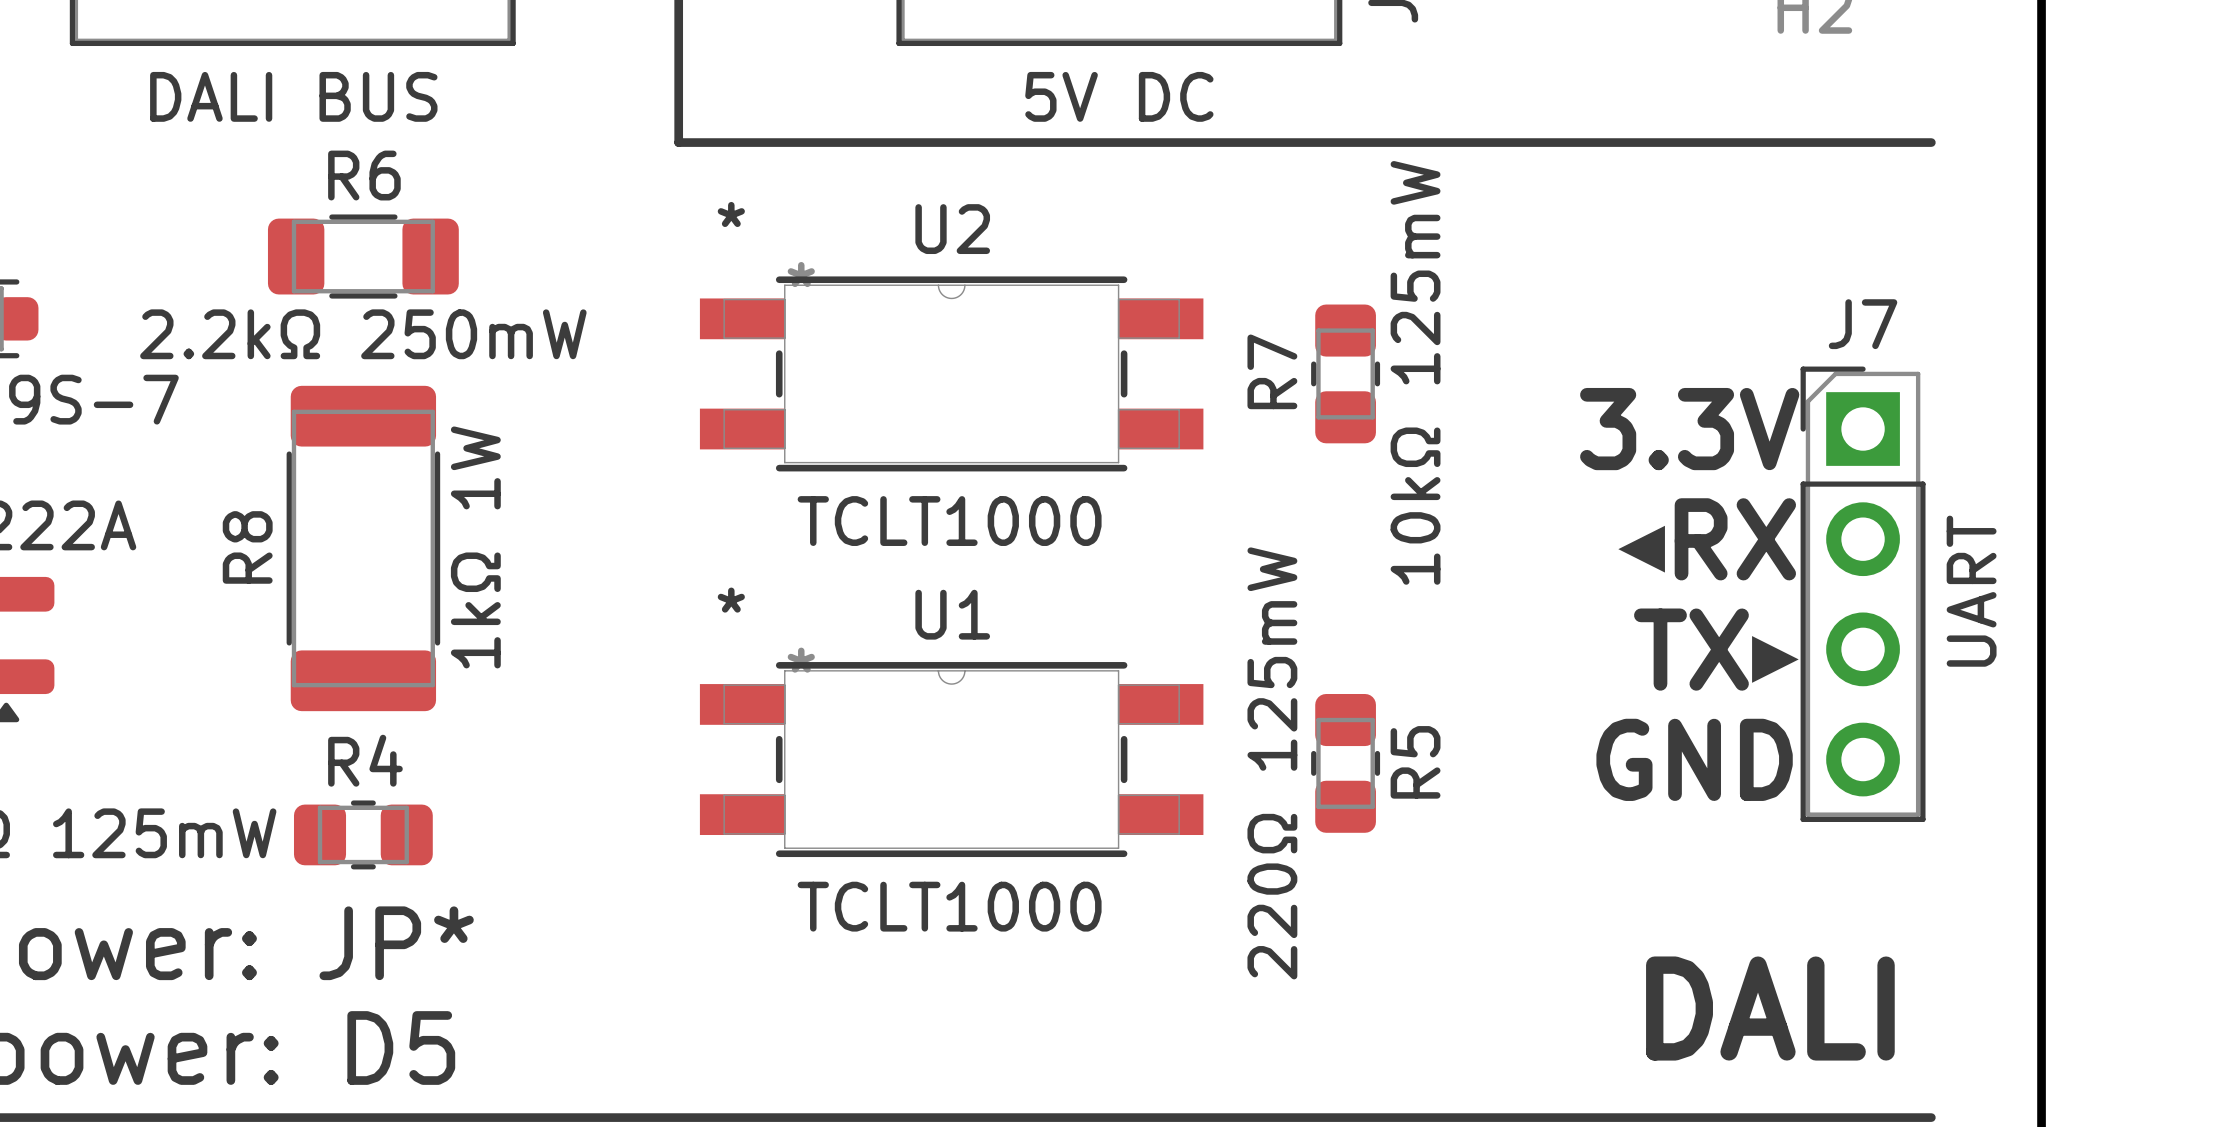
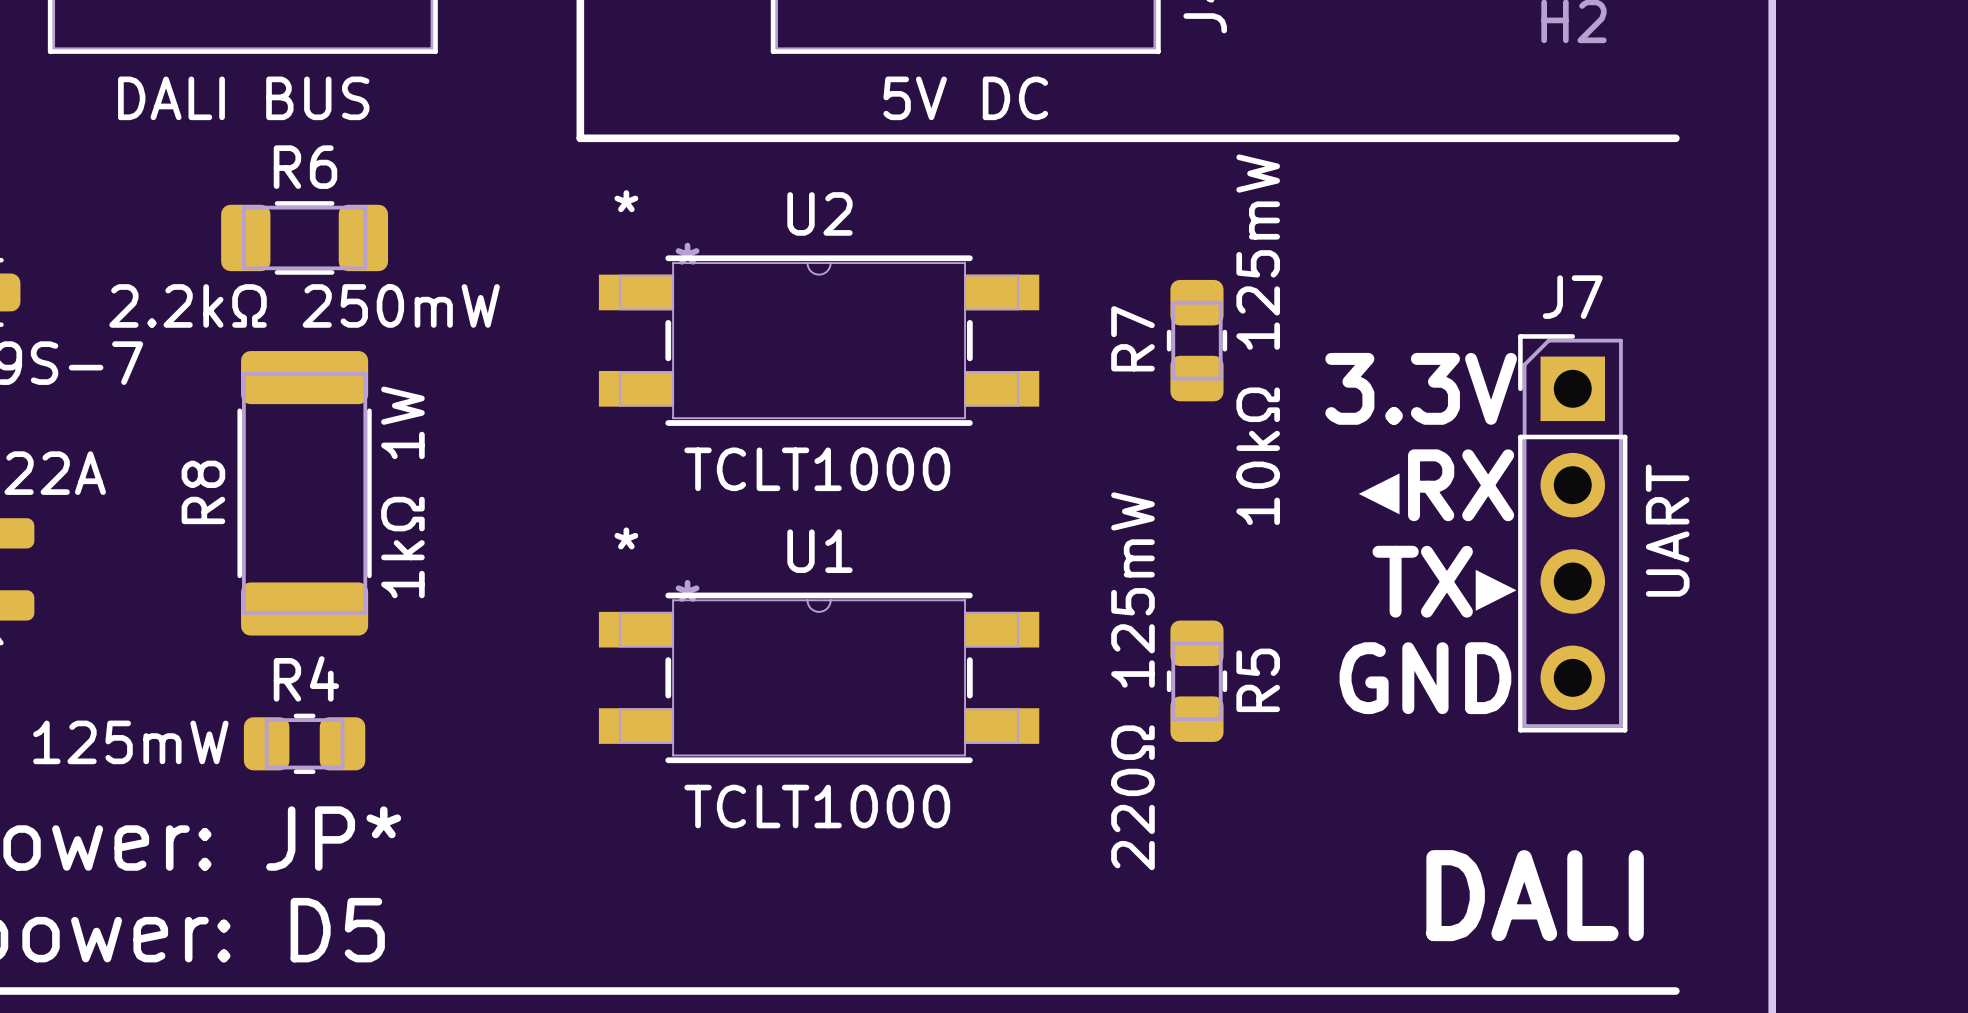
R7 position: (1345, 373) -> (1196, 340)
text position: 3.3V (1689, 429) -> 3.3V (1421, 388)
text position: ◂RX (1703, 539) -> ◂RX (1433, 485)
J7 position: (1863, 594) -> (1572, 533)
text position: TX▸ (1719, 649) -> TX▸ (1447, 581)
text position: GND (1694, 759) -> GND (1425, 678)
R5 position: (1345, 763) -> (1196, 681)

